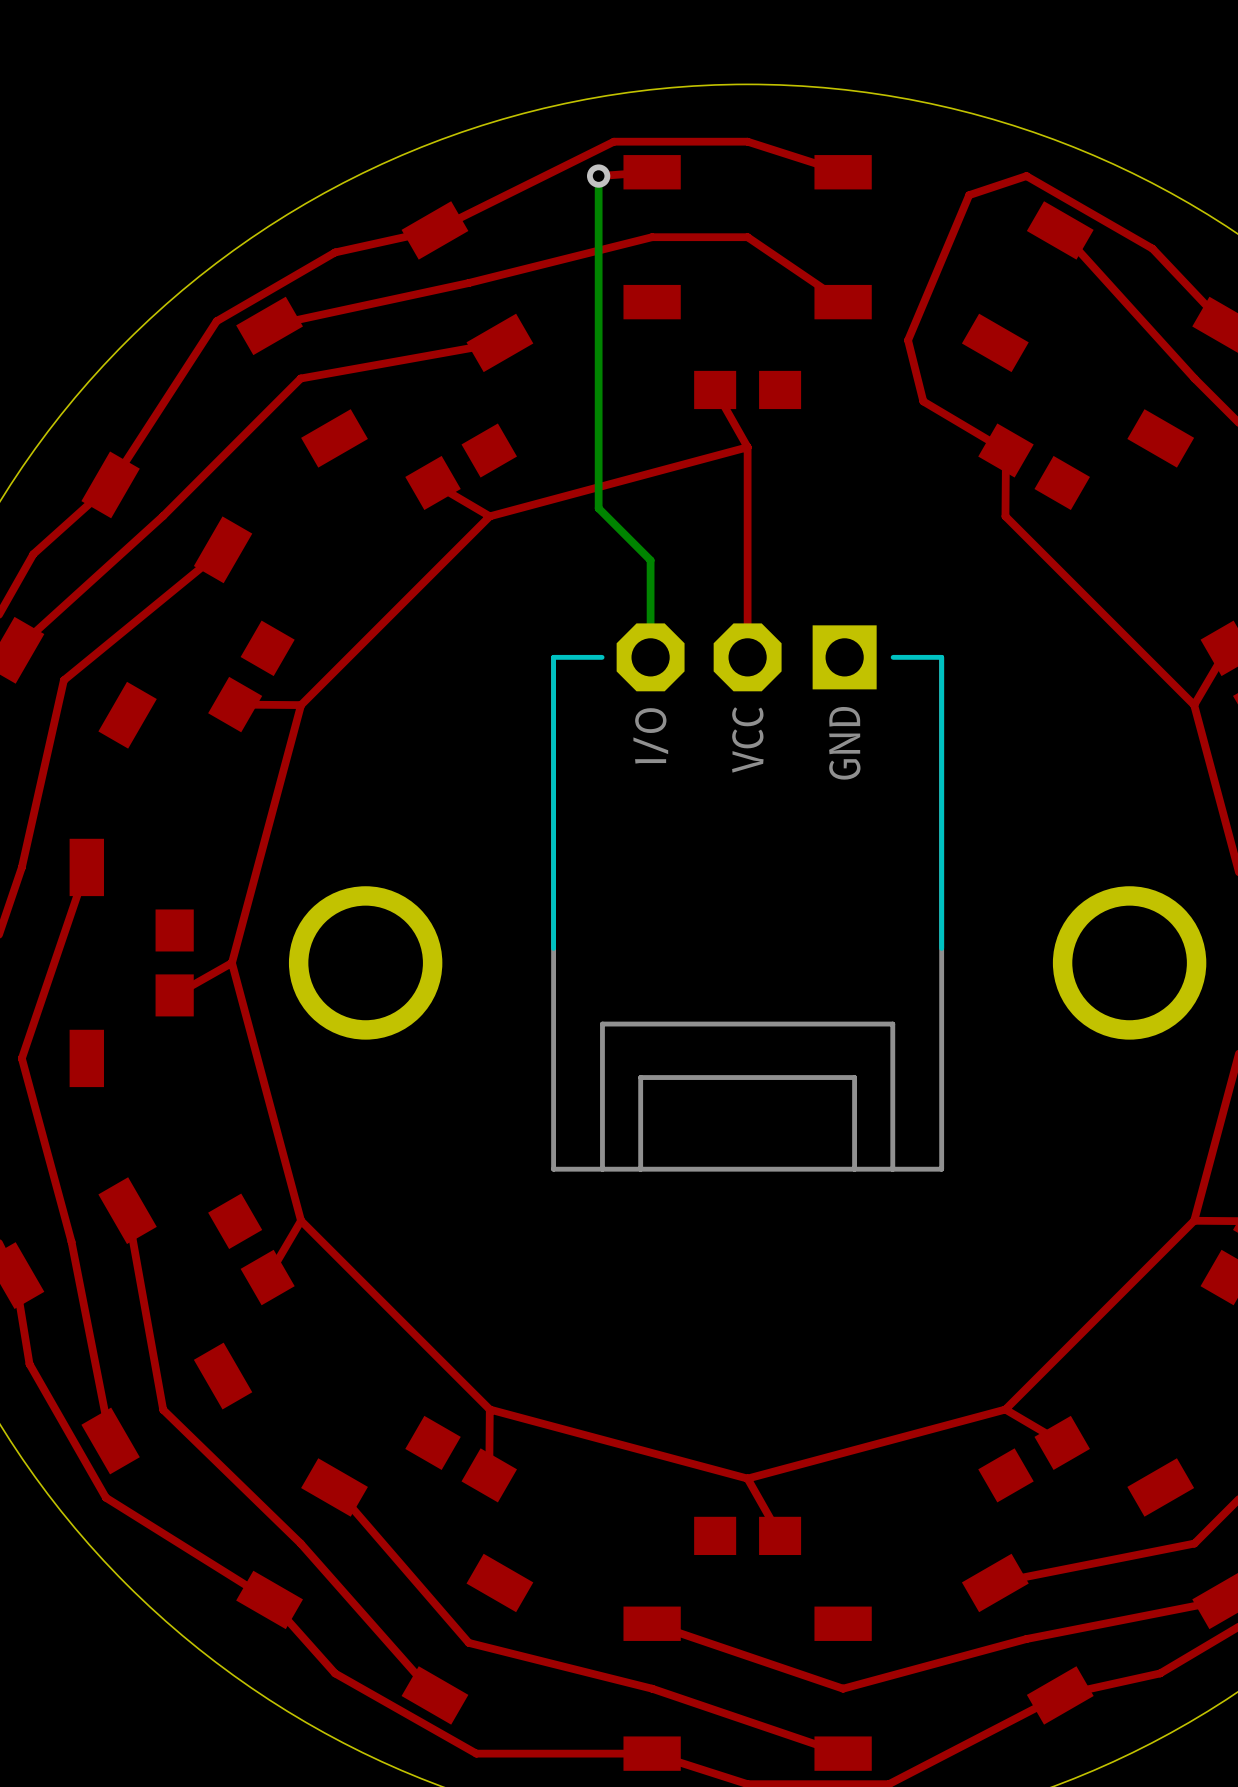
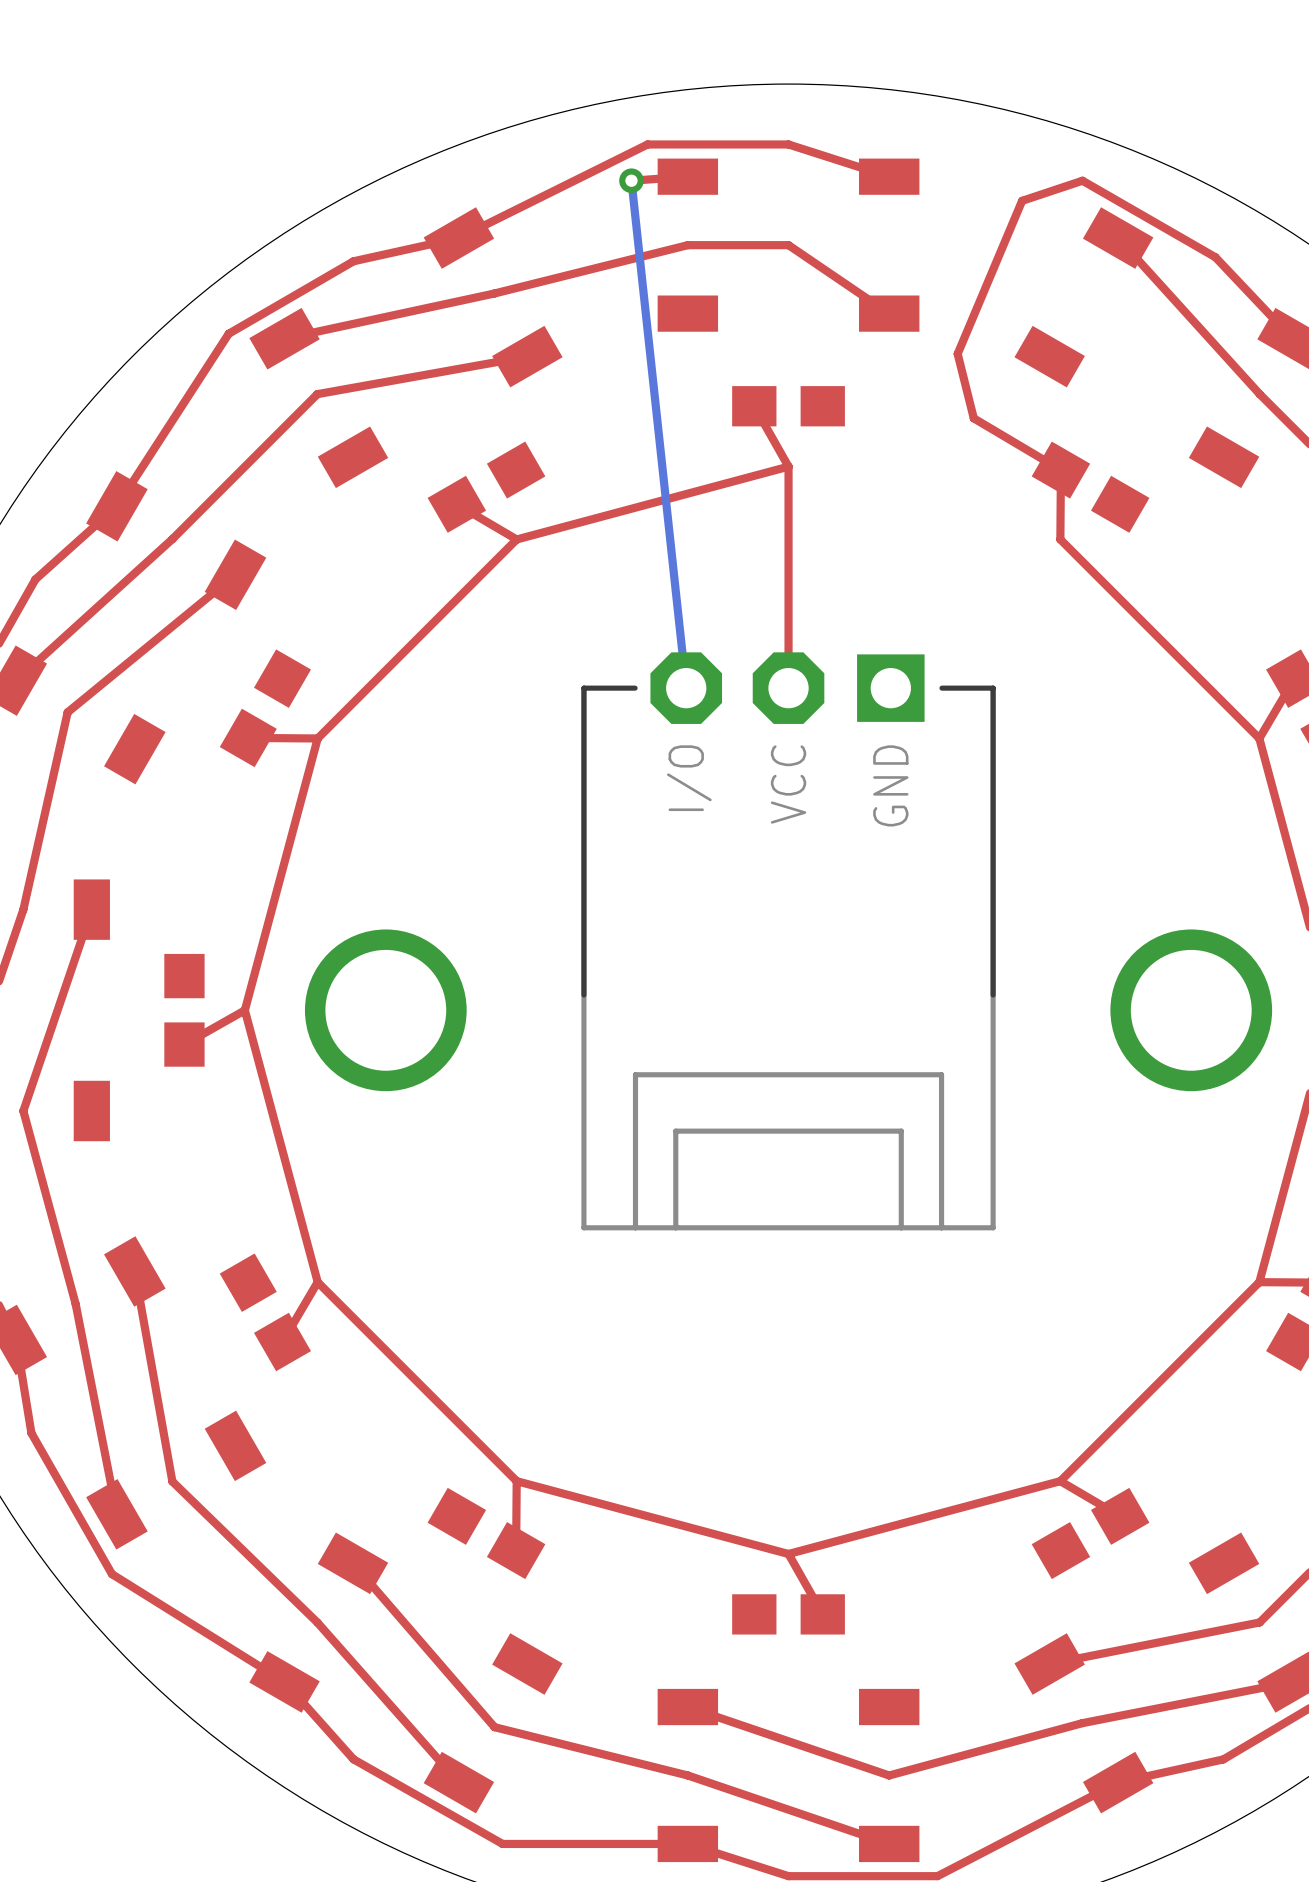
bottom track: (598, 176) (598, 508) (650, 560) (650, 657) -> (631, 180) (686, 688)

